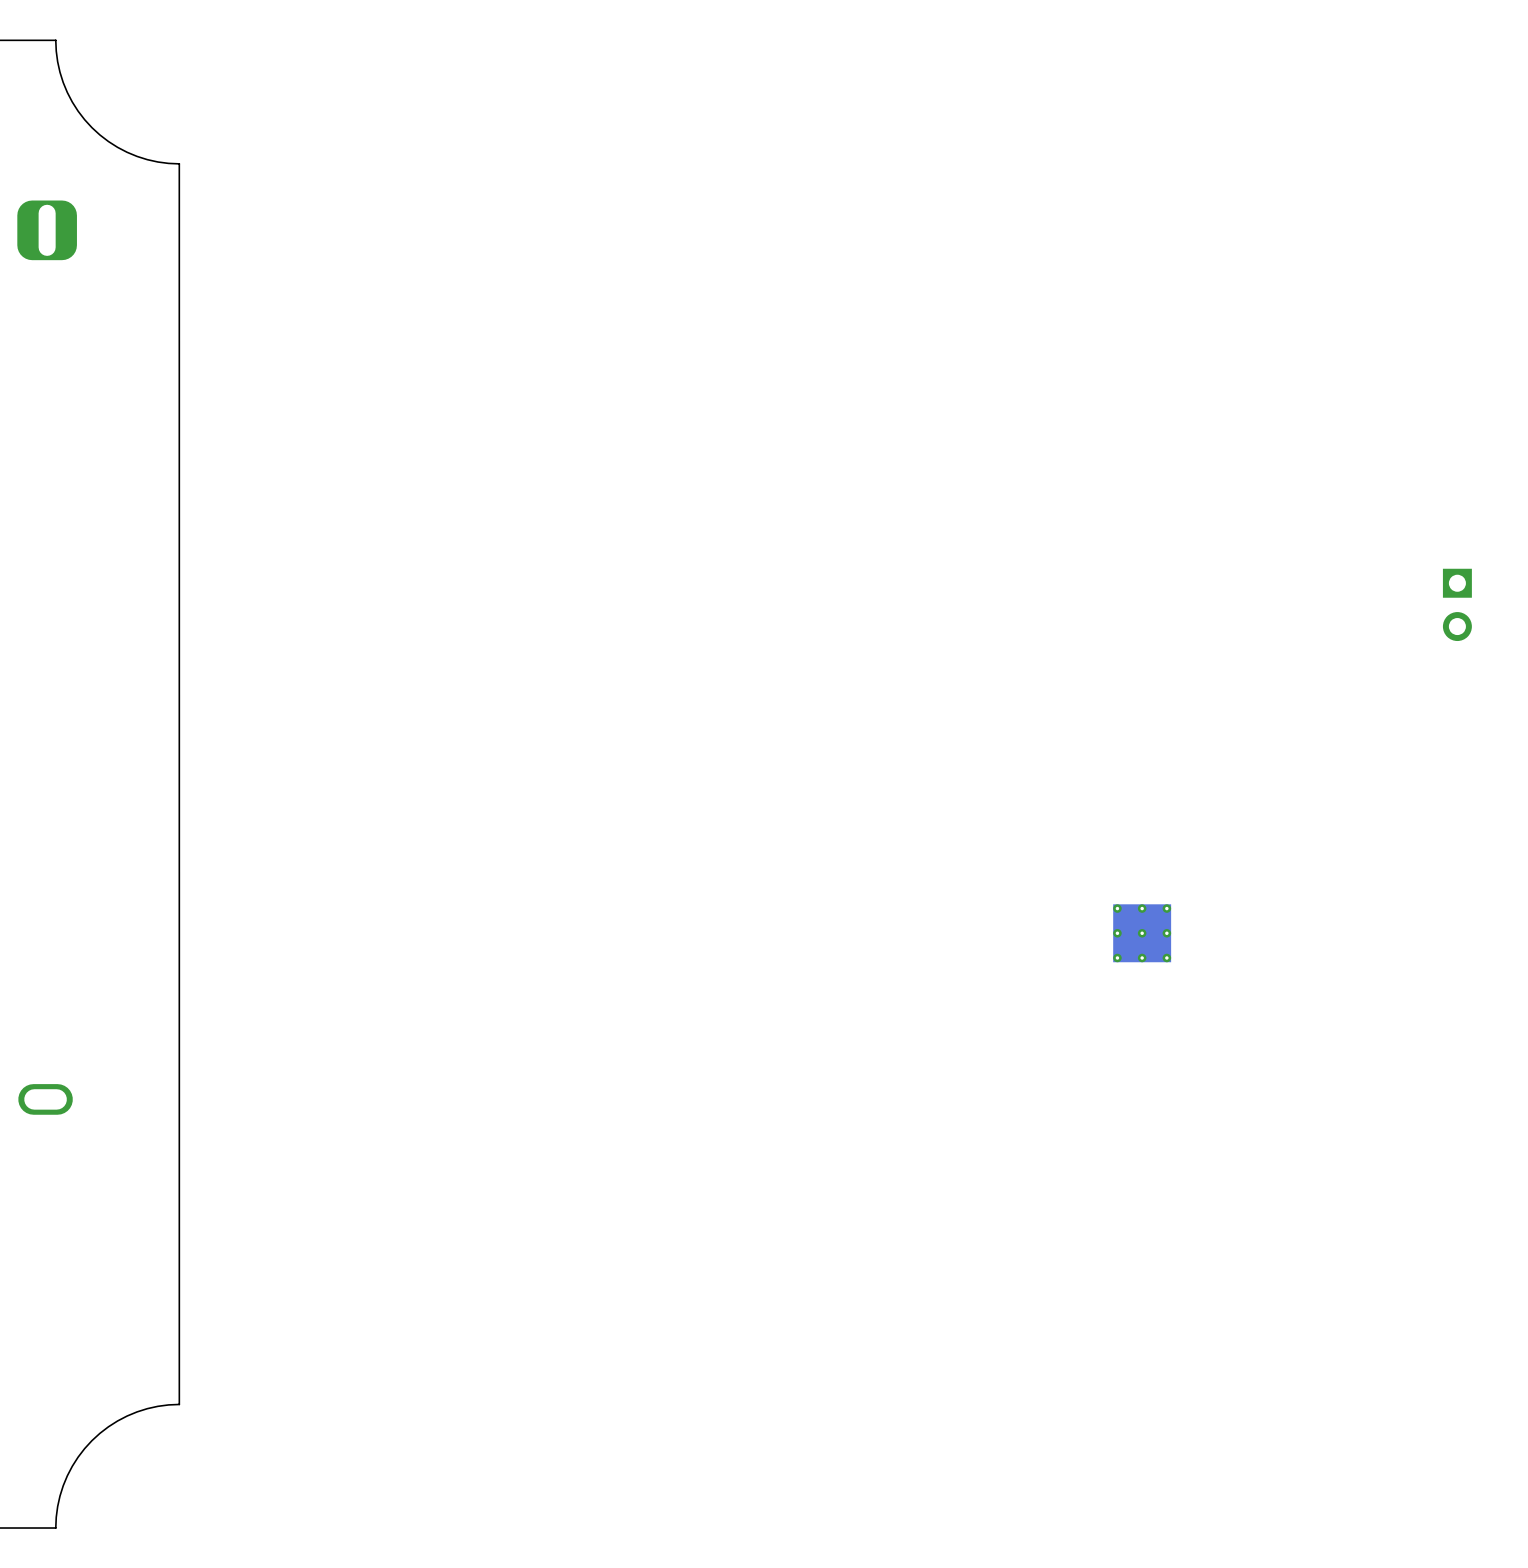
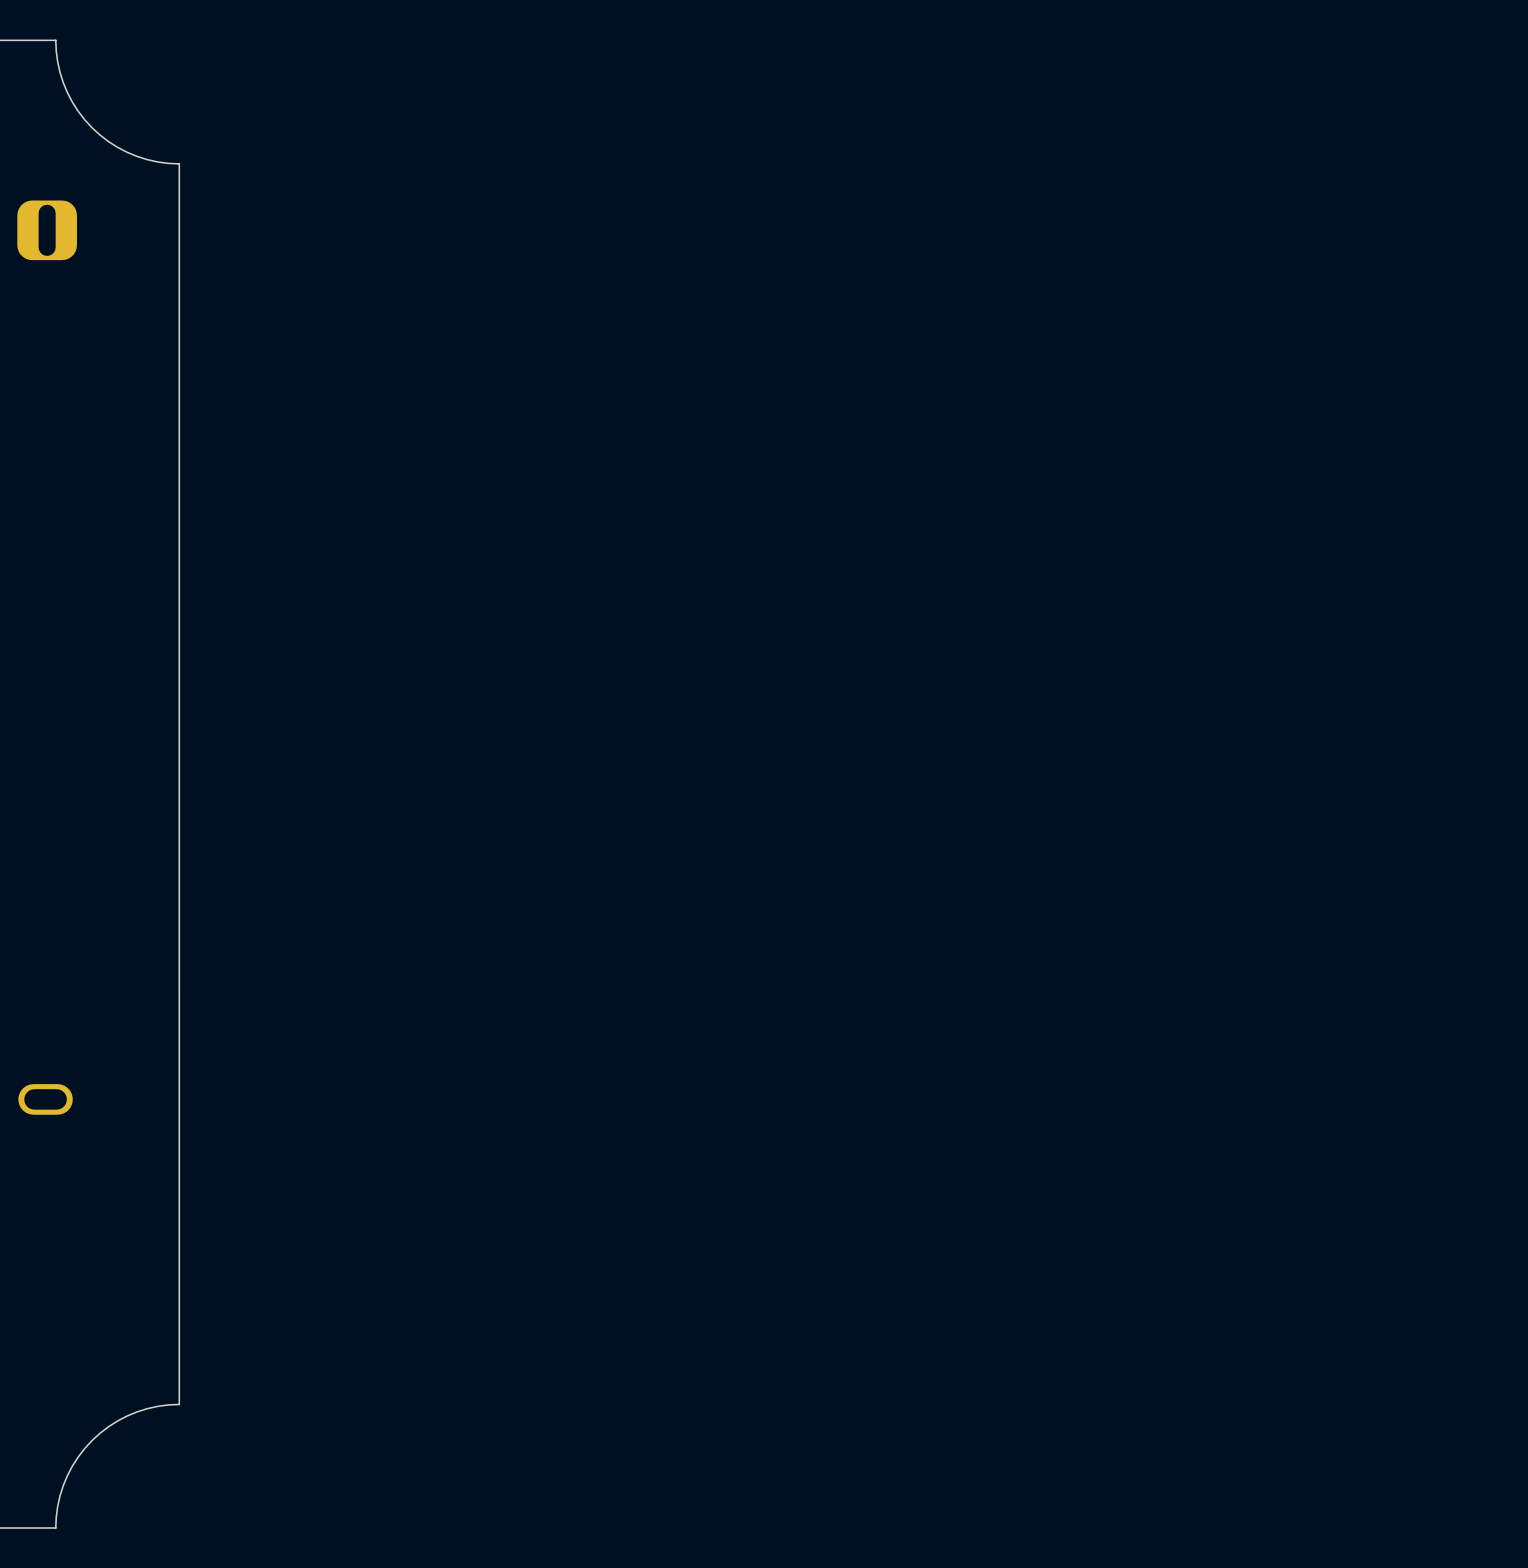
part: (1457, 604) -> none
part: (1142, 933) -> none

